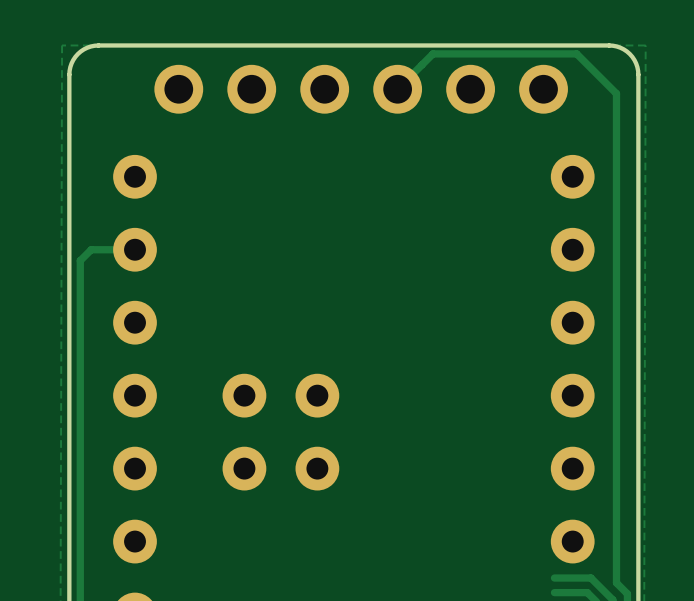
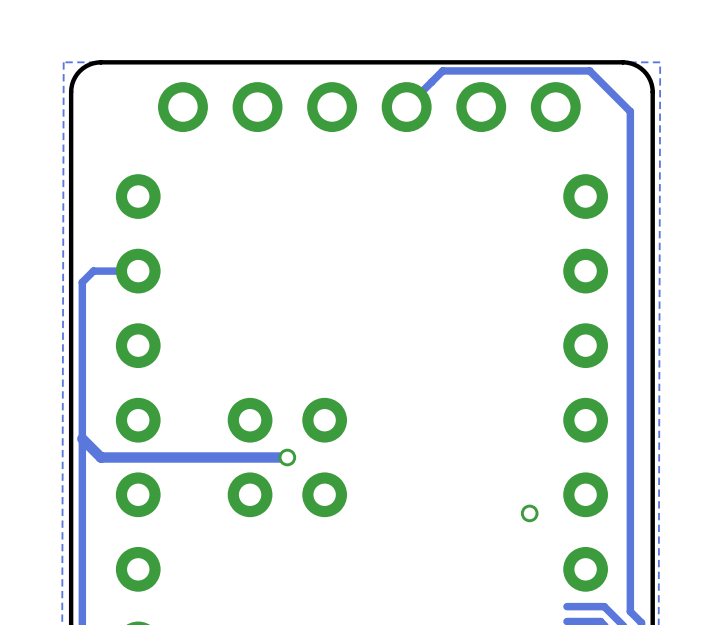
track: none -> (82, 438) (100, 457) (287, 457)
via: none -> (287, 457)
via: none -> (529, 513)

